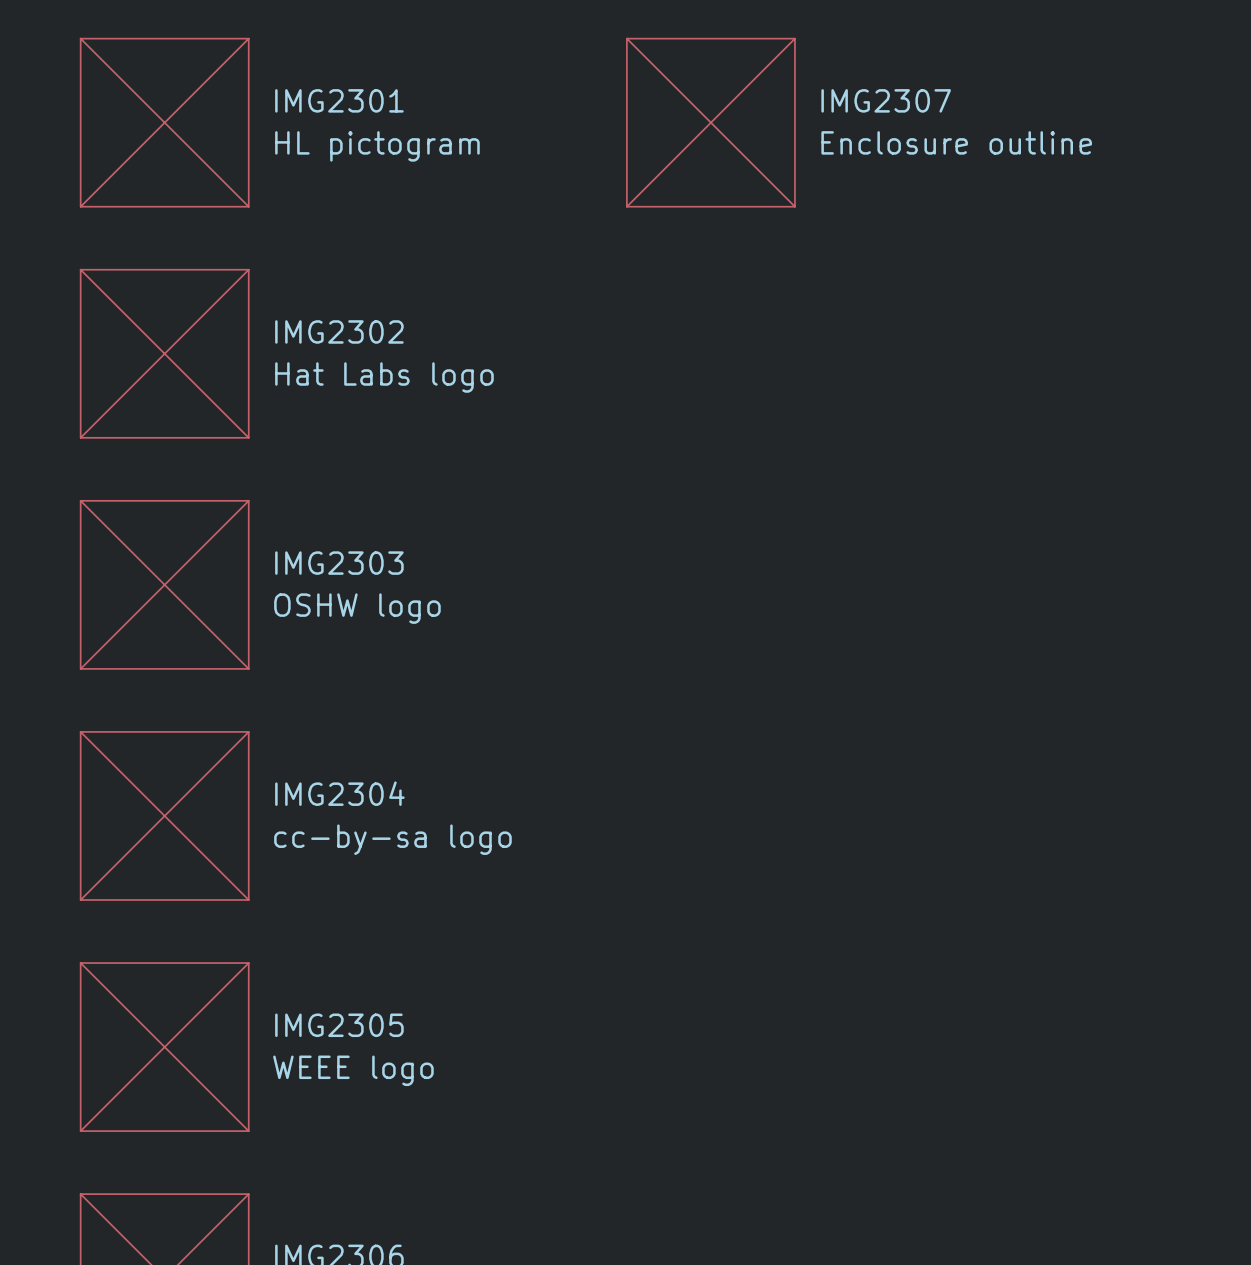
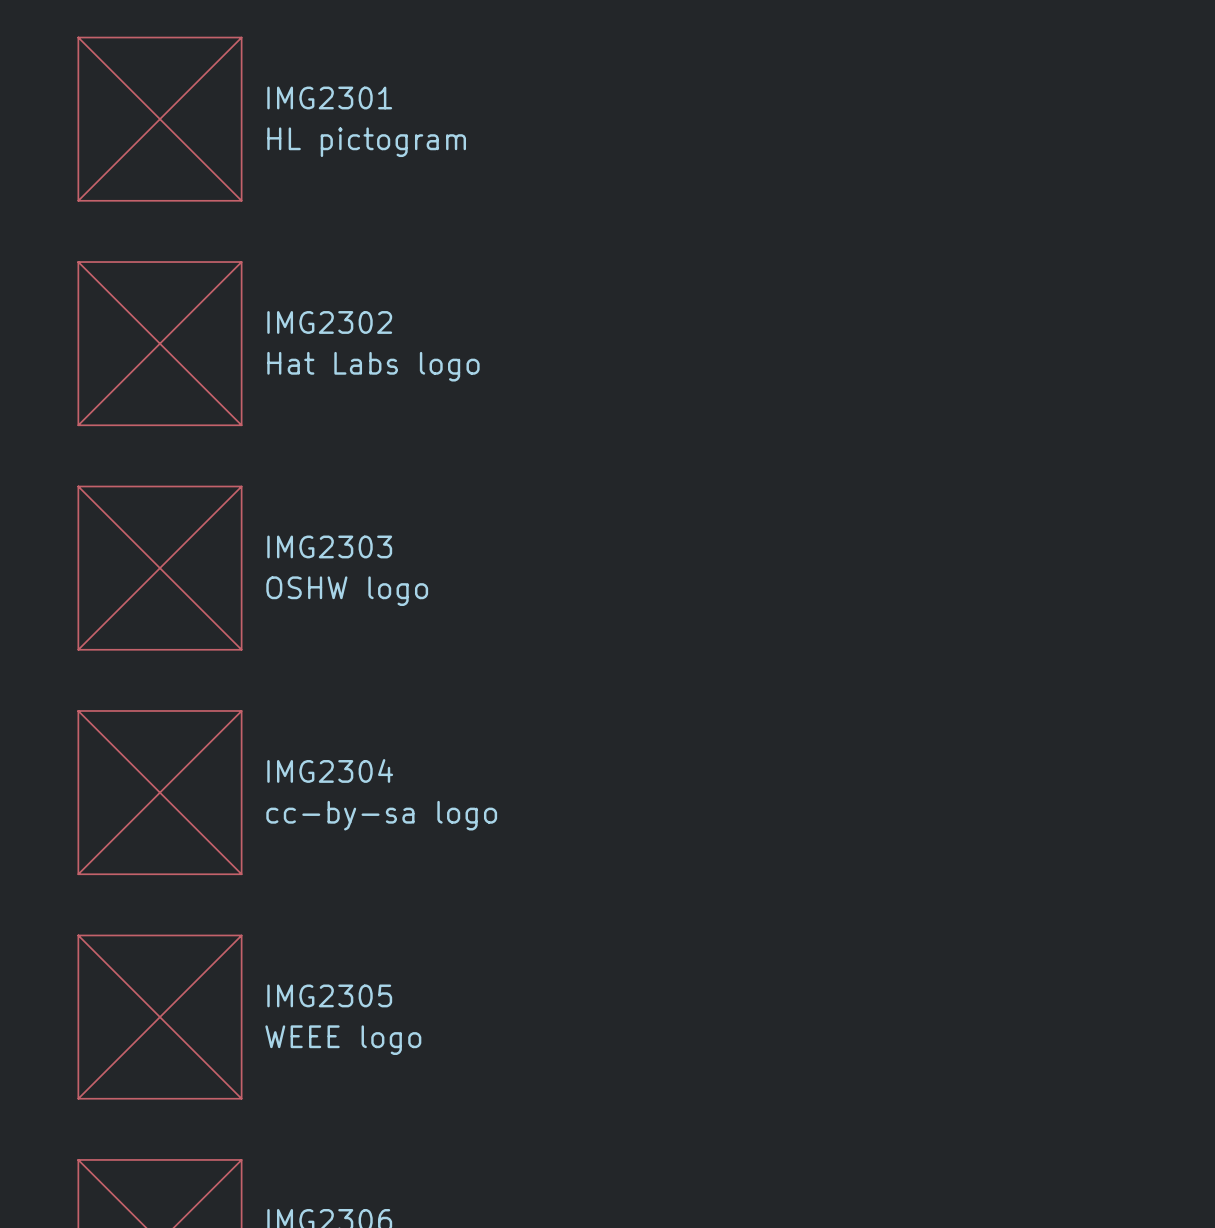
IMG2307: Enclosure outline (710, 122) -> none

